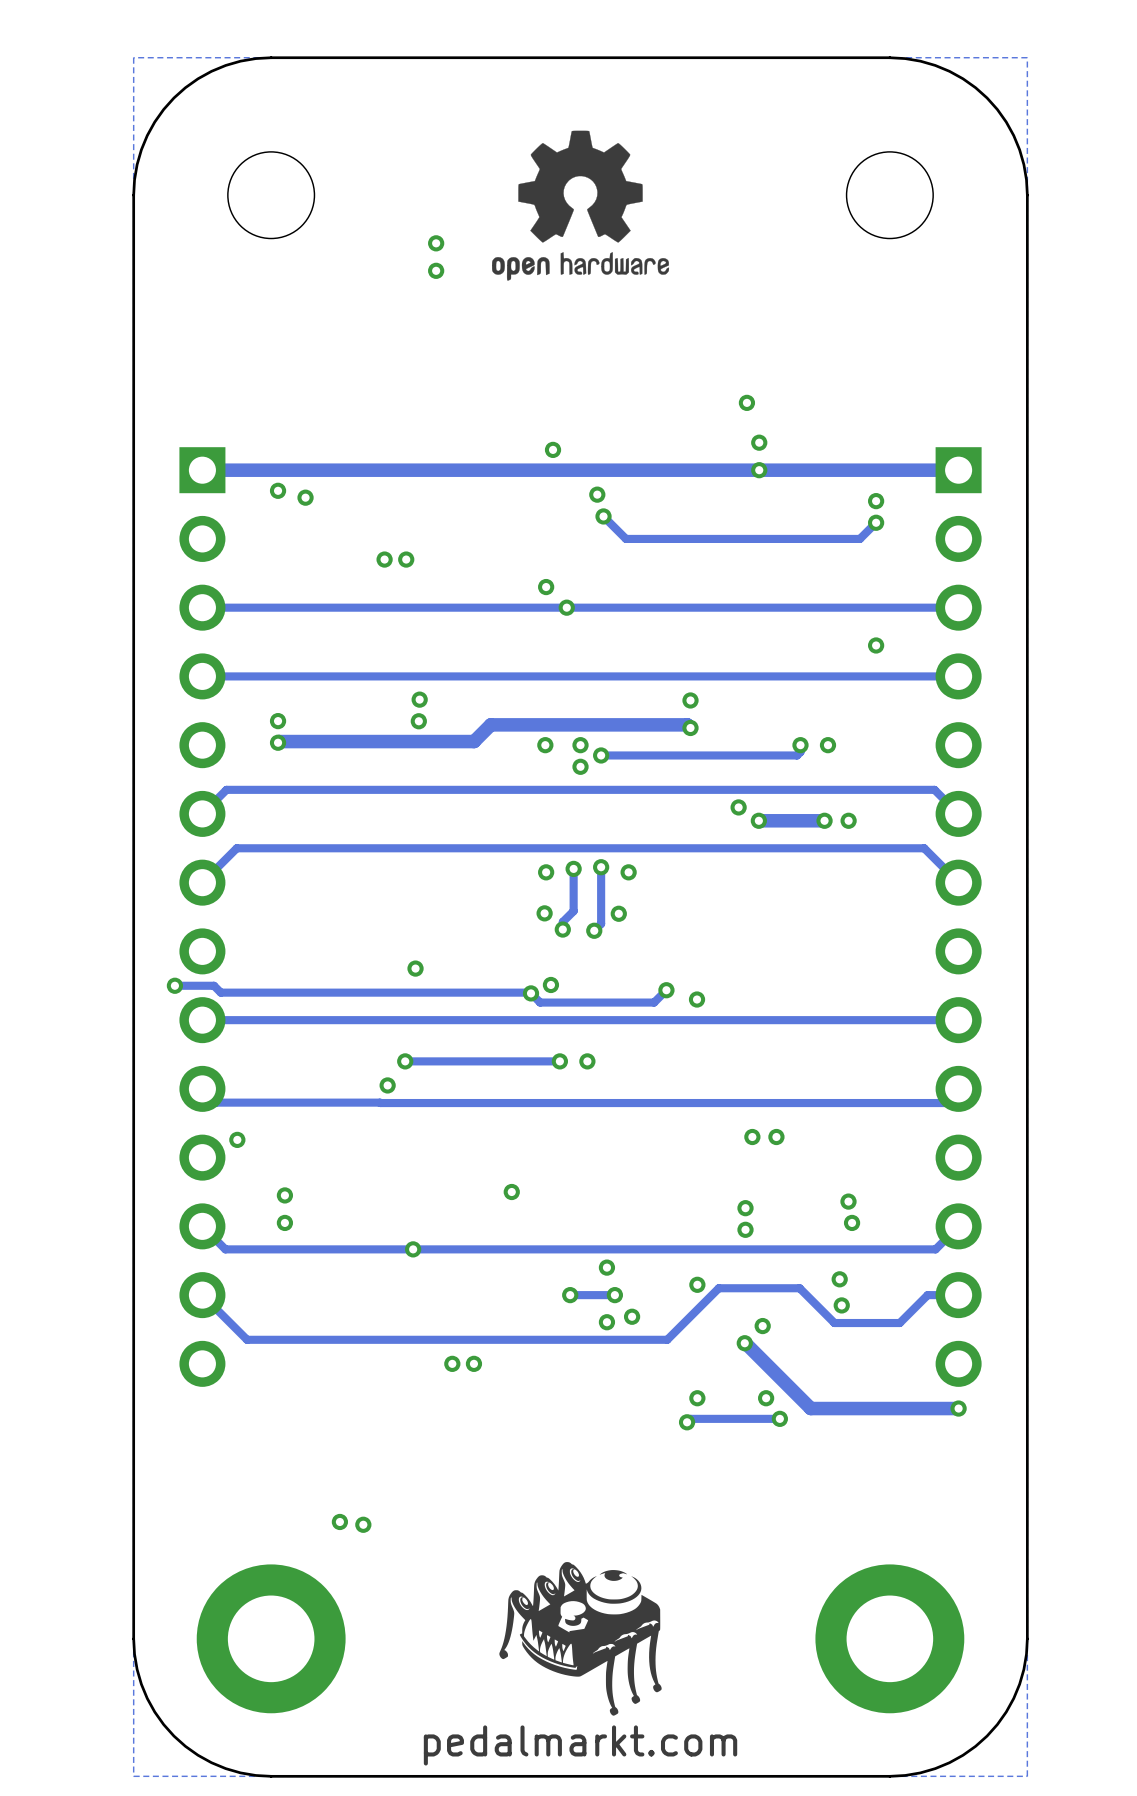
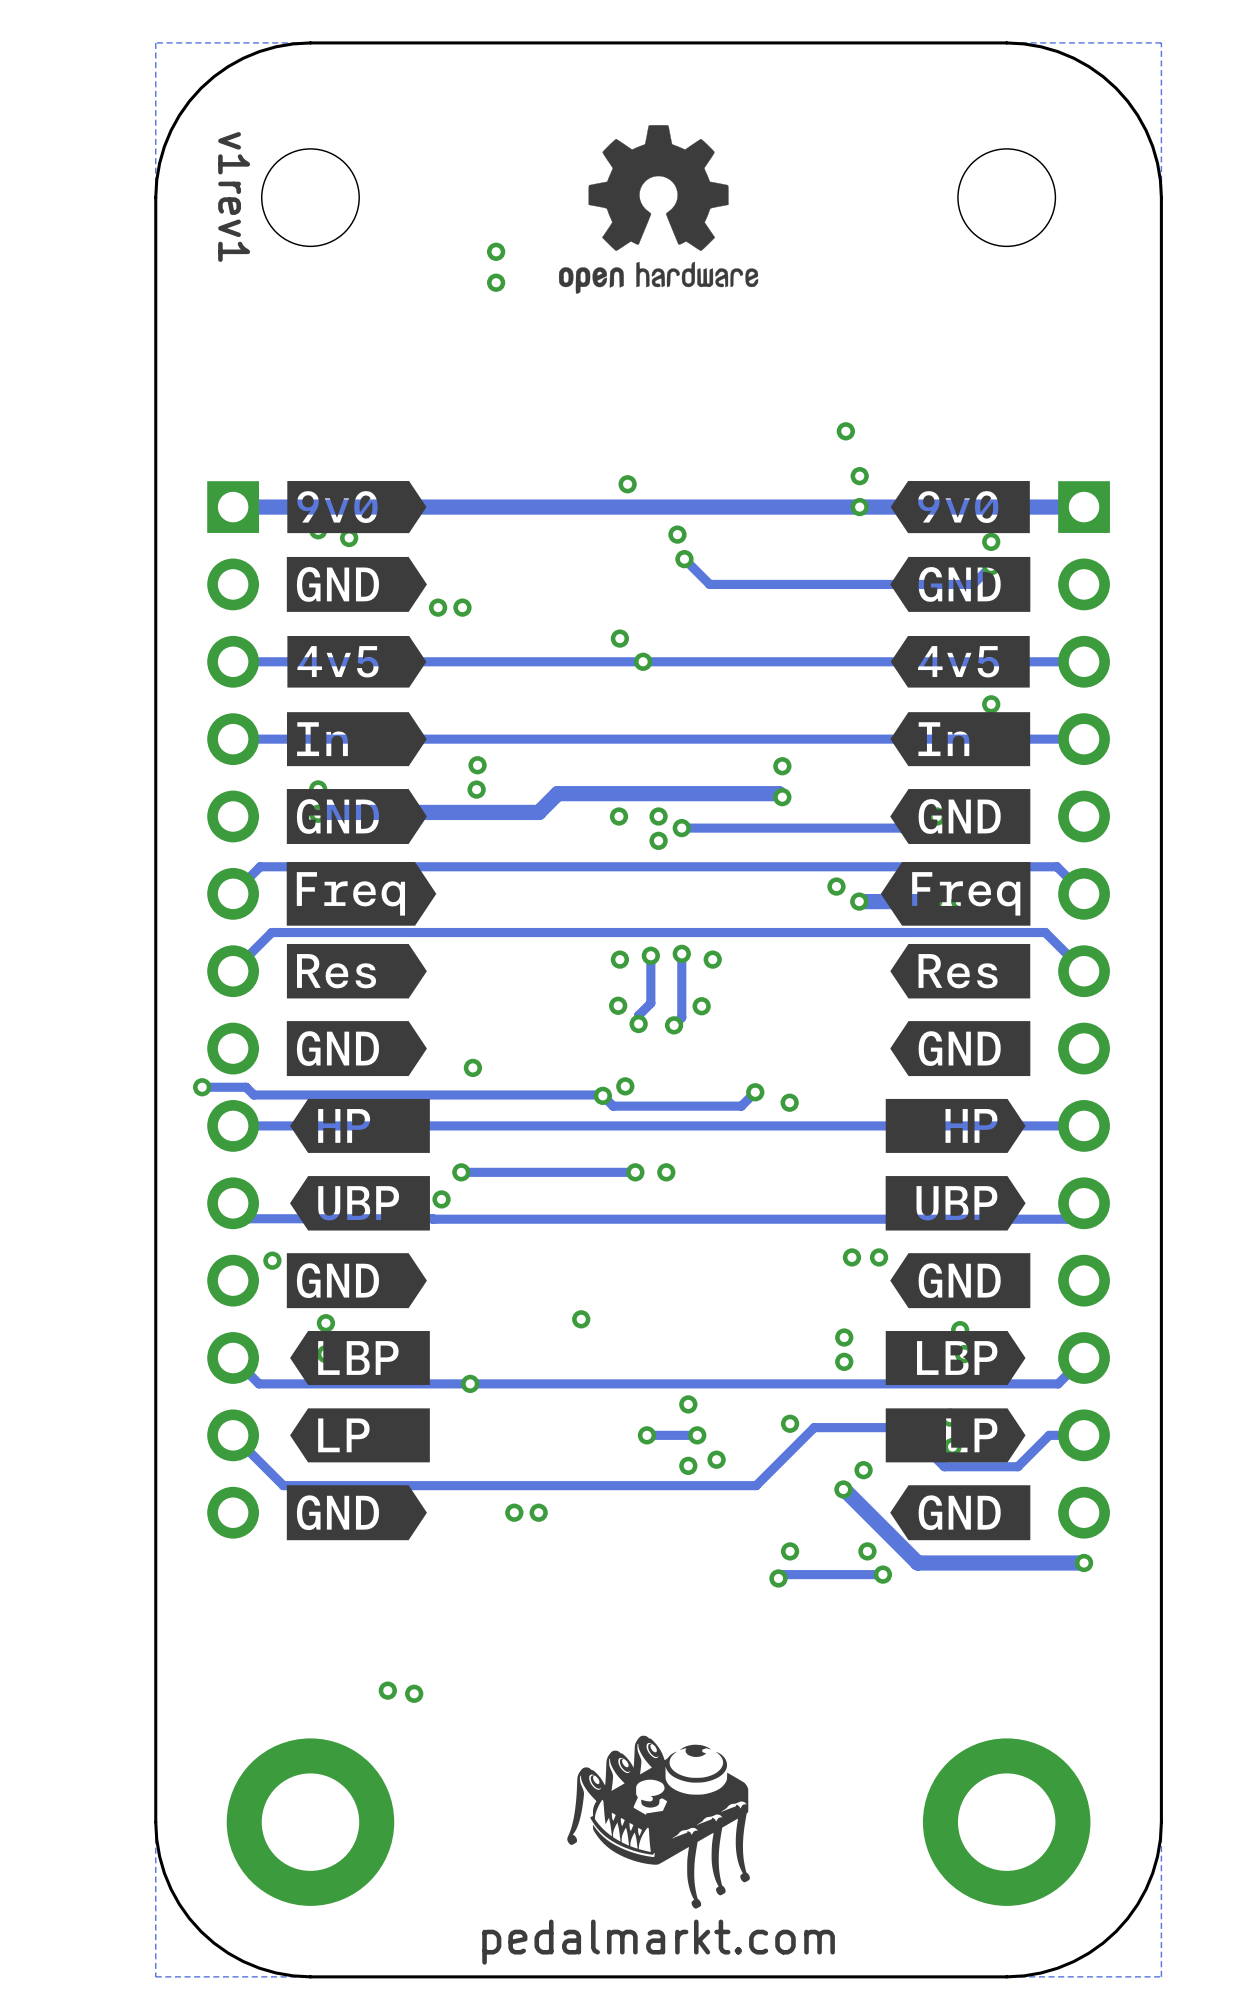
text: none -> v1rev1 (234, 196)
drawing: none -> [286, 481, 437, 1541]
drawing: none -> [880, 481, 1031, 1541]

